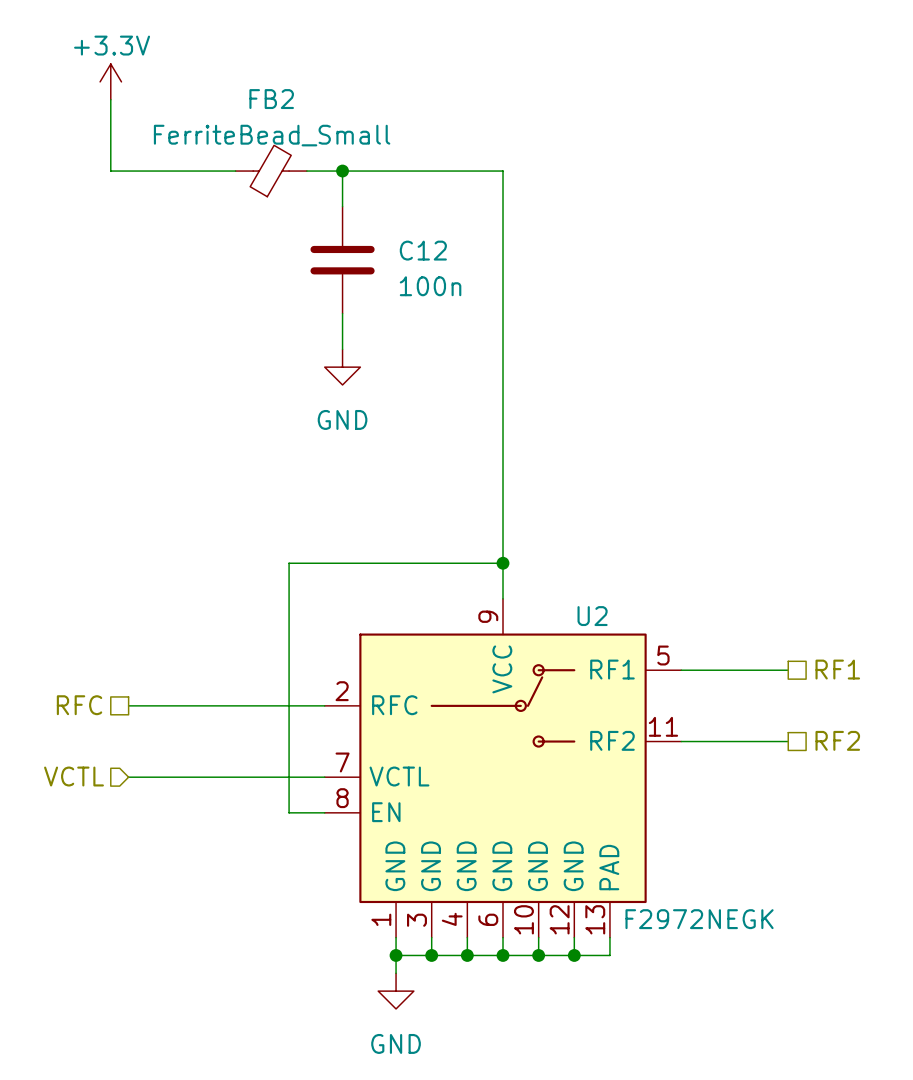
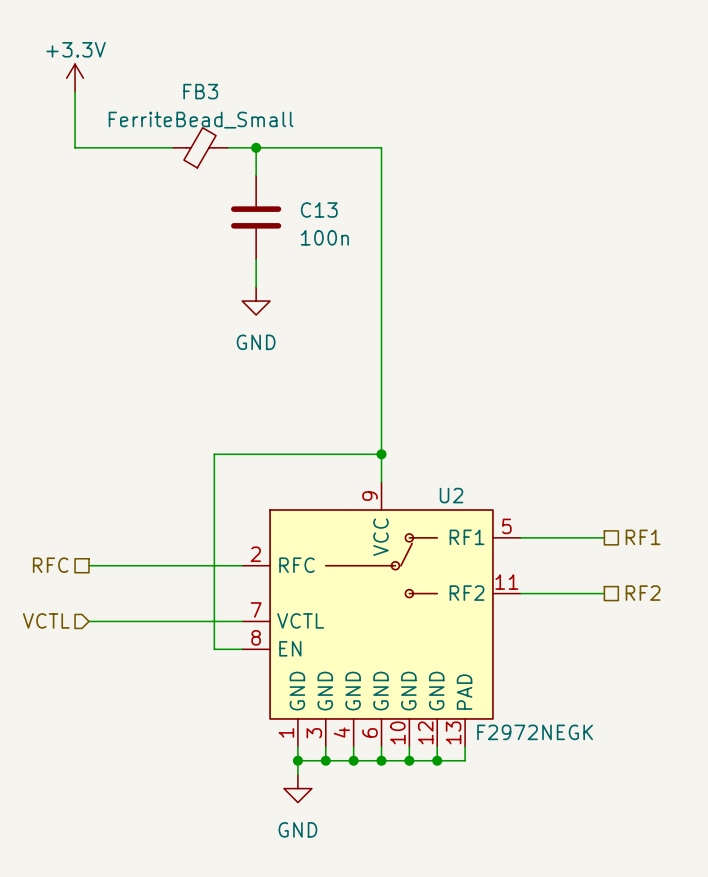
FB2 name: FB2 (271, 99) -> FB3 (200, 91)
C12 name: C12 (423, 250) -> C13 (319, 209)

